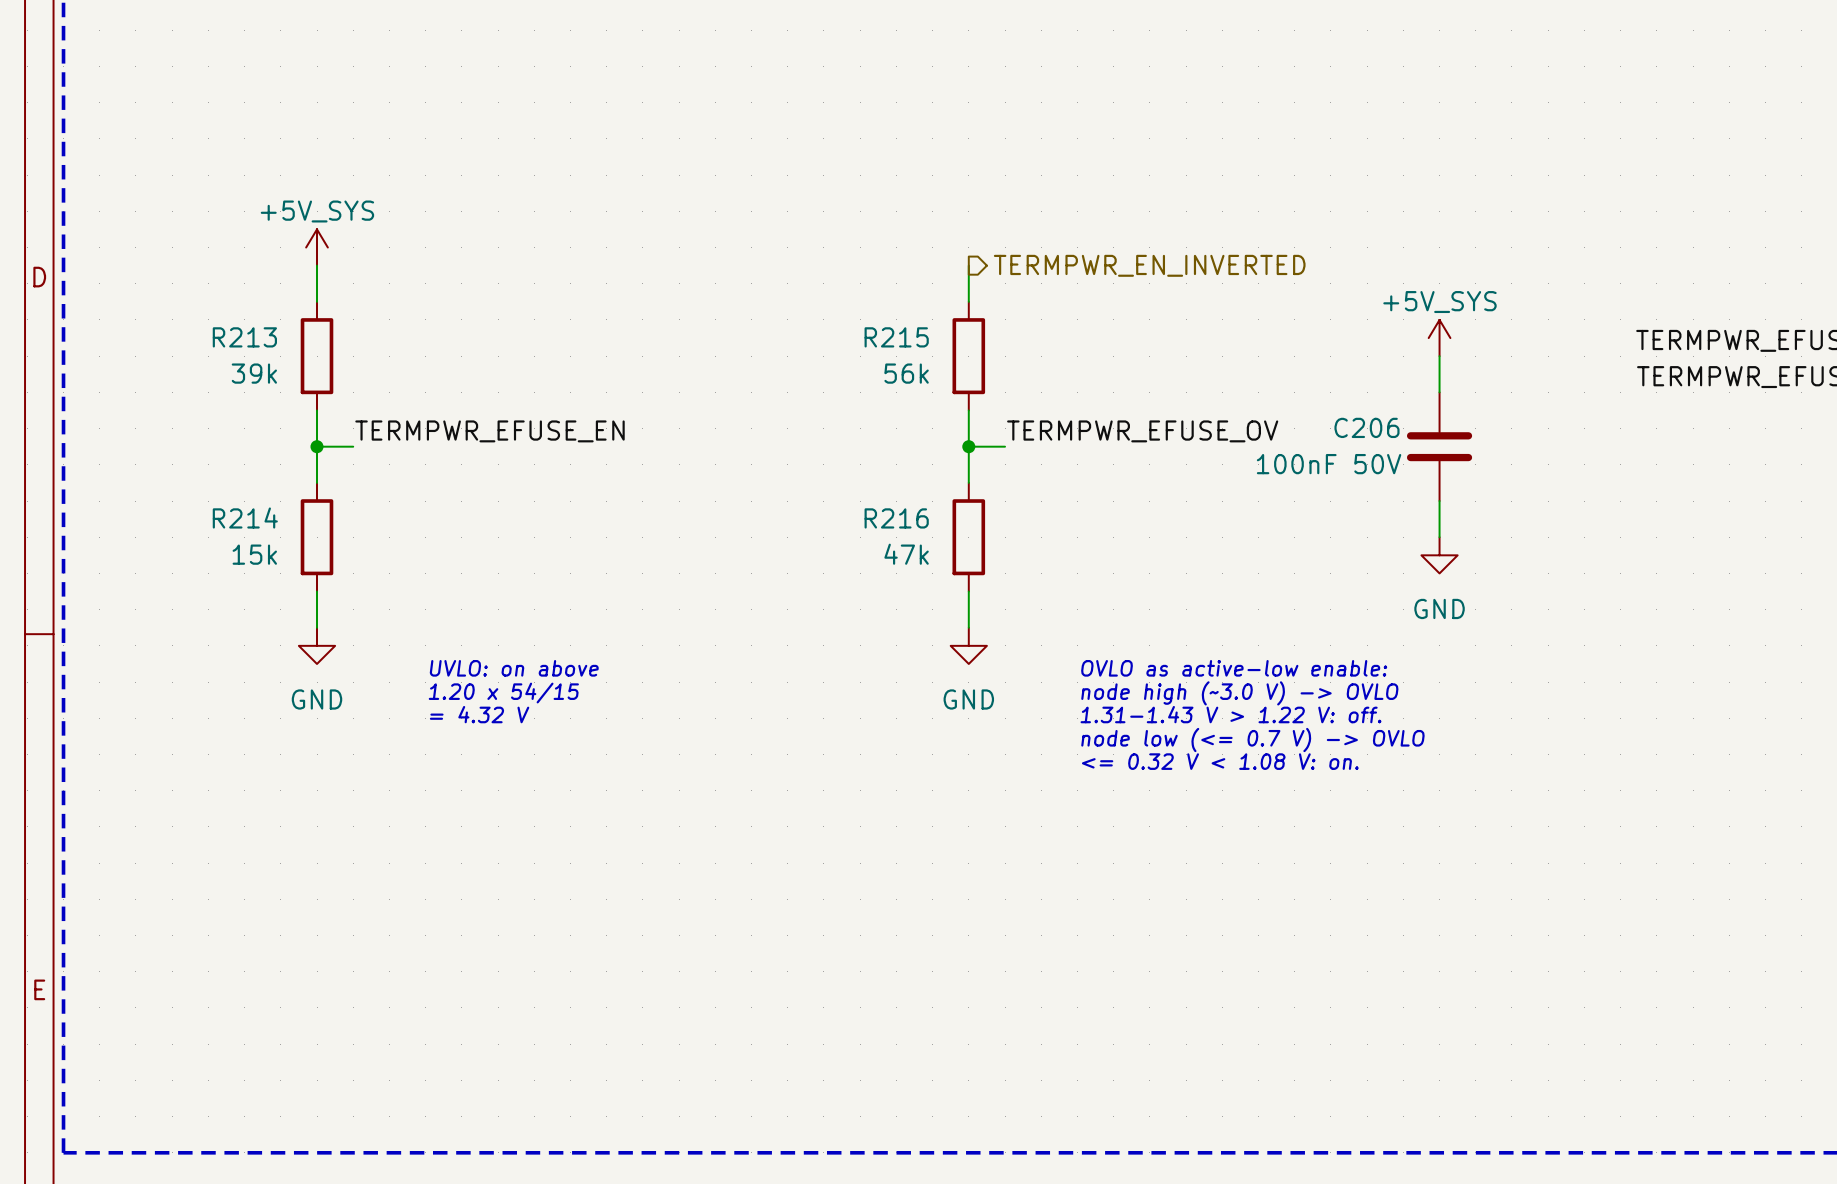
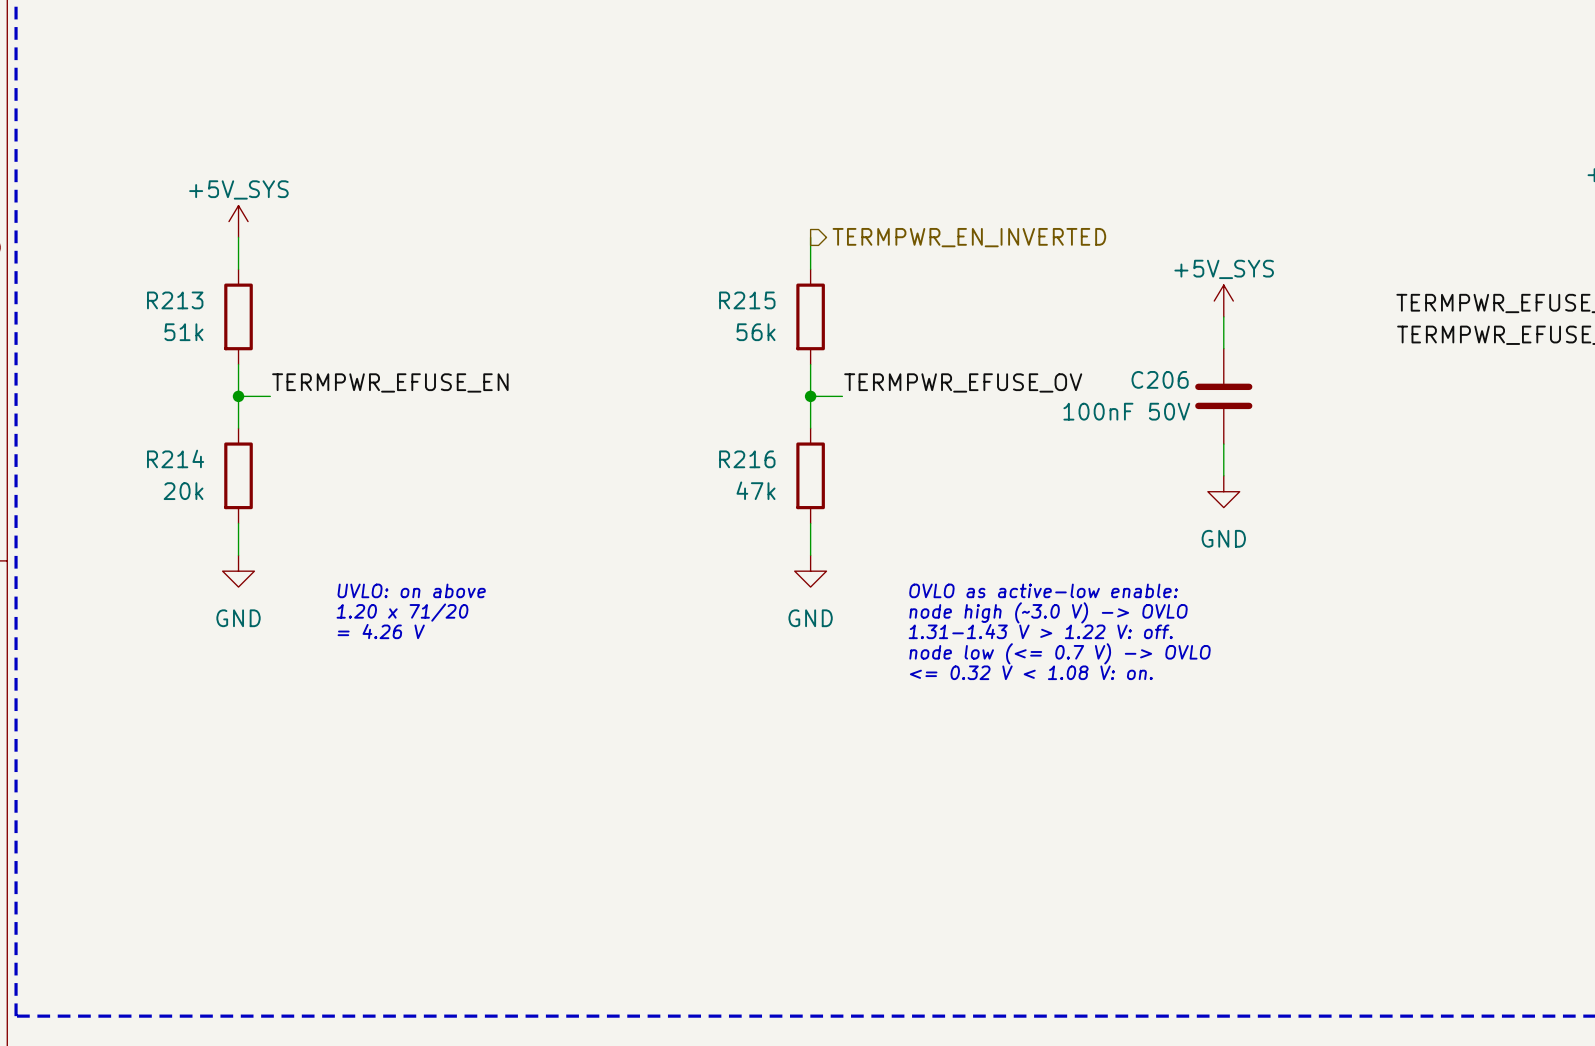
R213 value: 39k (254, 373) -> 51k (183, 332)
R214 value: 15k (254, 554) -> 20k (183, 491)
text: 1.20 x 54/15 (503, 693) -> 1.20 x 71/20 (402, 612)
text: = 4.32 V (479, 714) -> = 4.26 V (381, 631)

